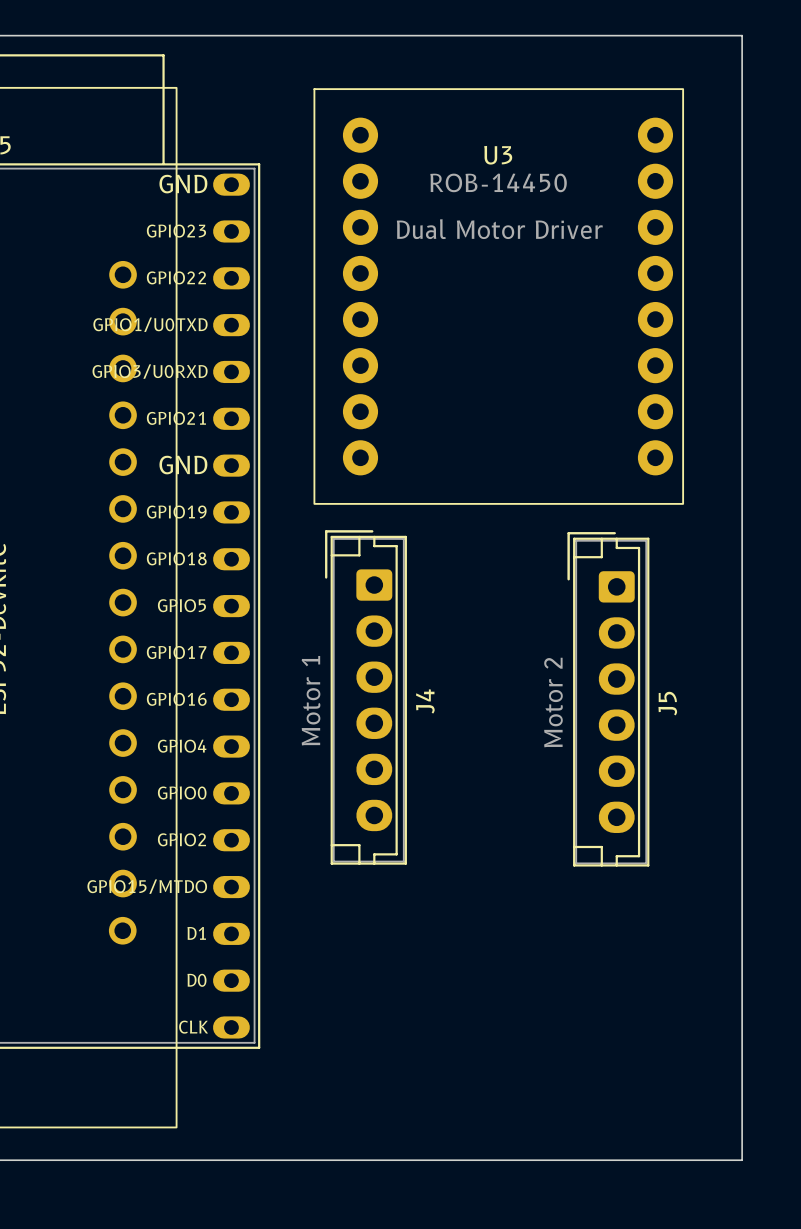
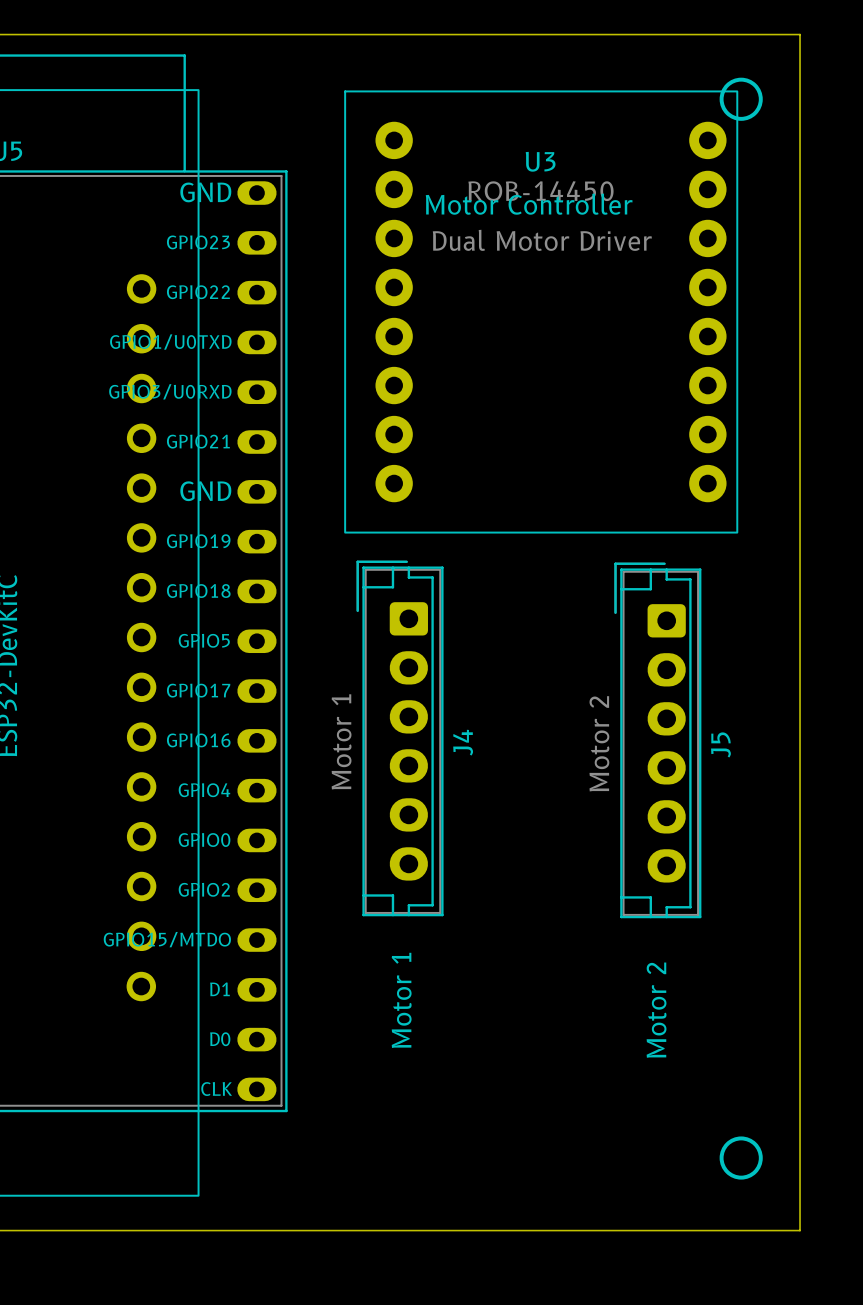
drawing: none -> [719, 77, 763, 121]
text: none -> Motor Controller (529, 204)
text: none -> Motor 1 (401, 1000)
text: none -> Motor 2 (656, 1010)
drawing: none -> [719, 1136, 763, 1180]

